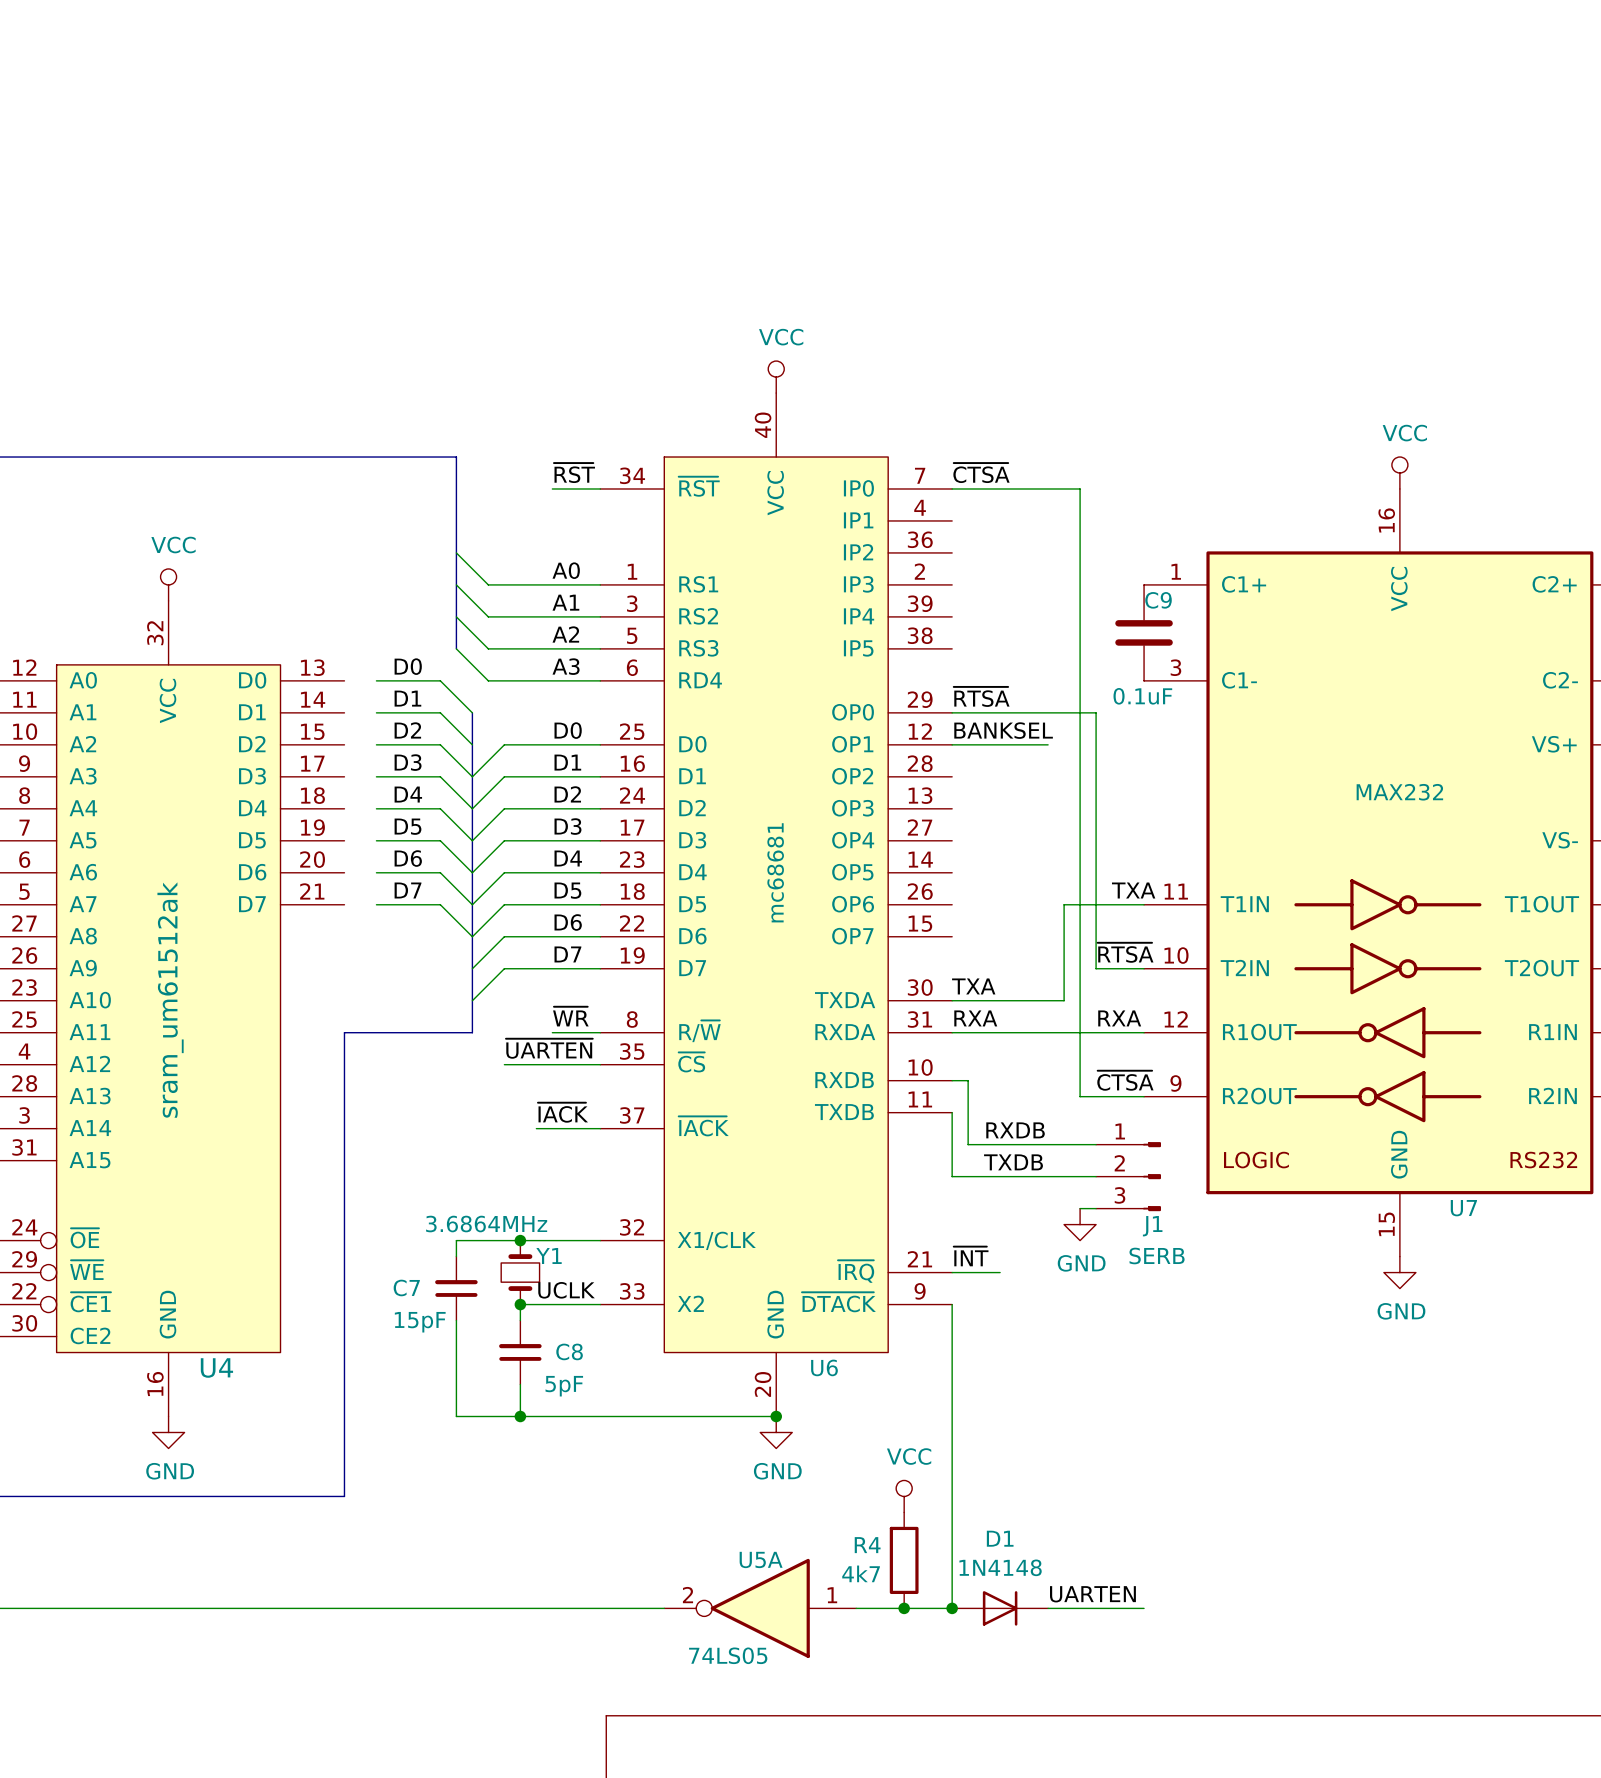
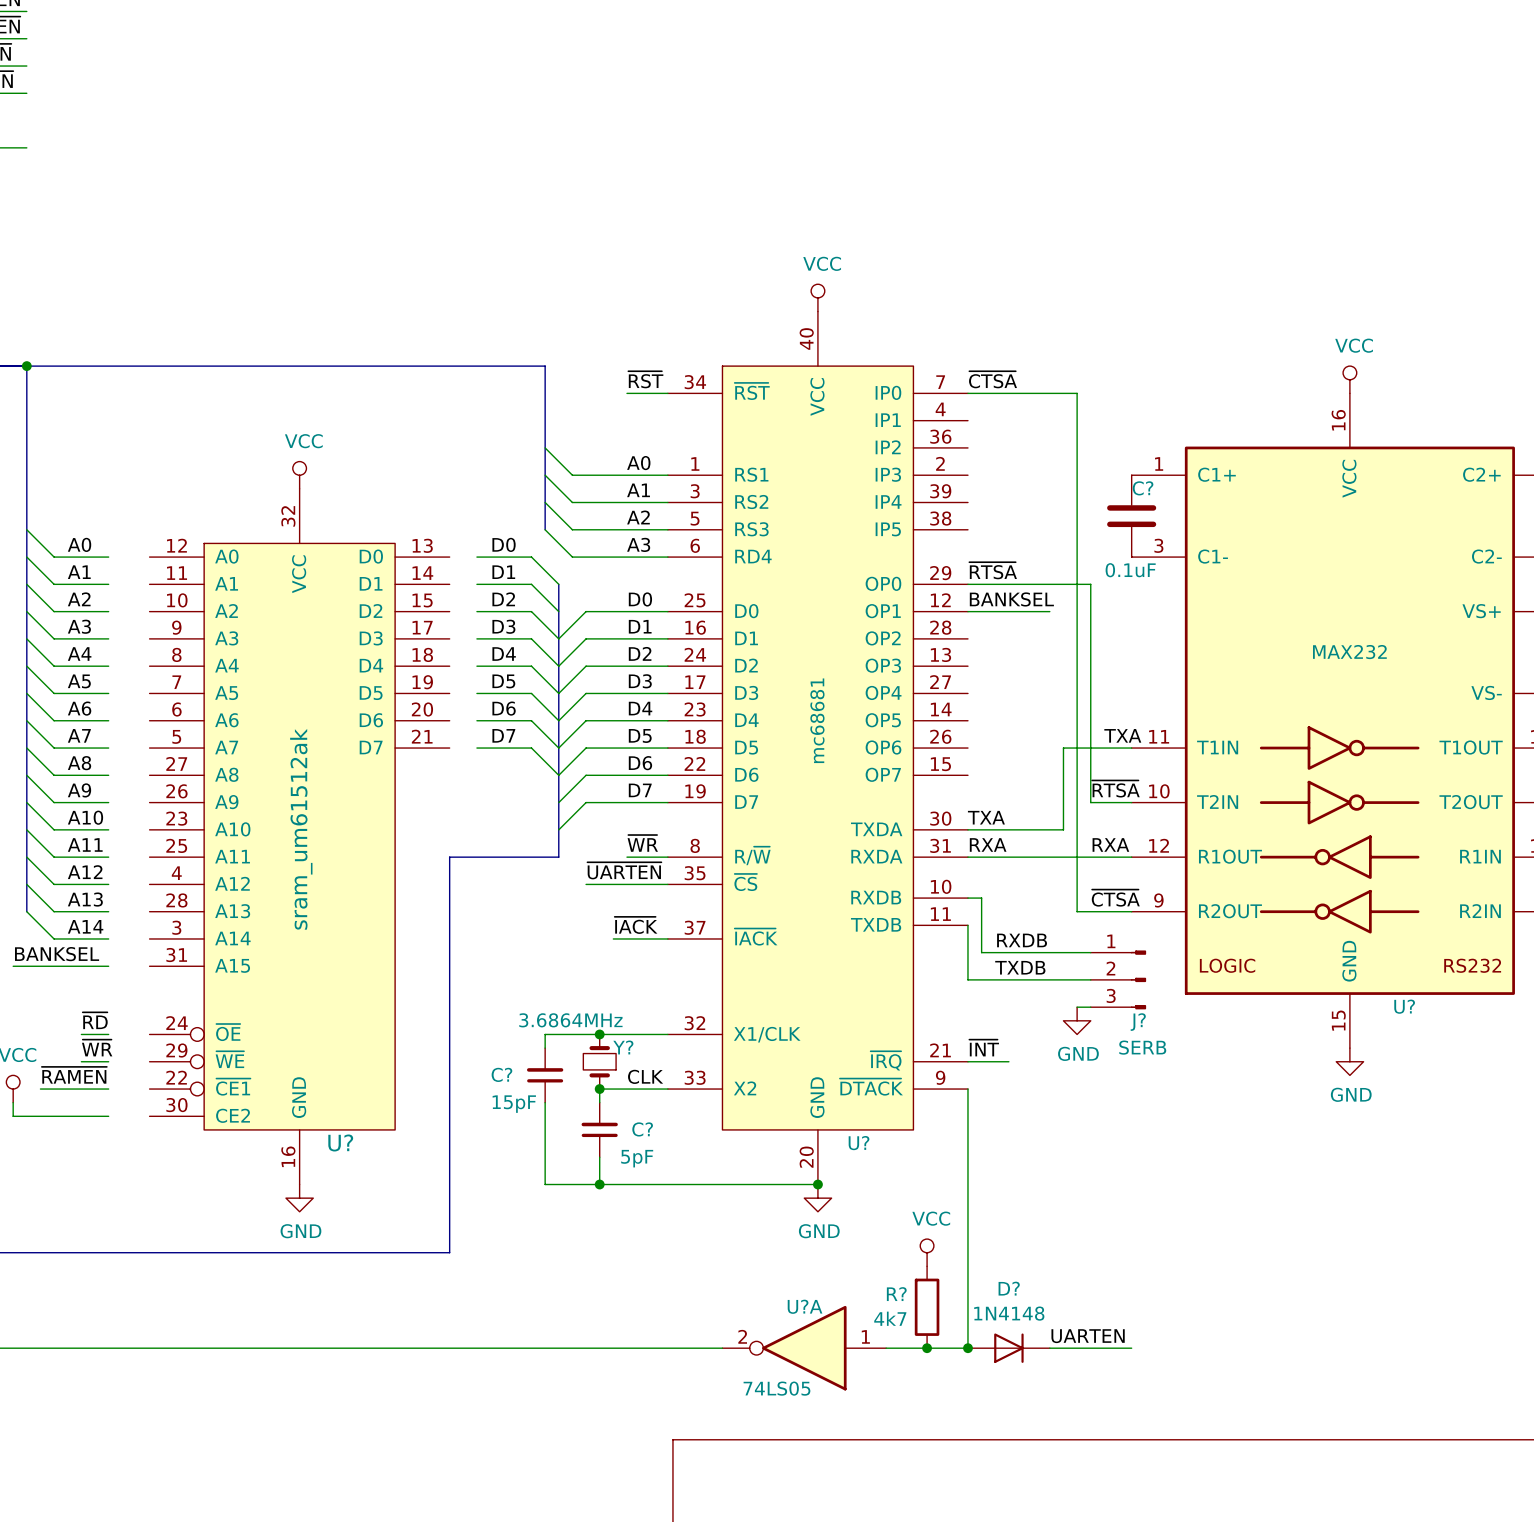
C9 name: C9 (1158, 600) -> C? (1143, 488)
U7 name: U7 (1463, 1208) -> U? (1404, 1006)
J1 name: J1 (1152, 1226) -> J? (1138, 1022)
Y1 name: Y1 (549, 1255) -> Y? (623, 1047)
C7 name: C7 (406, 1287) -> C? (501, 1074)
label: UCLK (566, 1290) -> CLK (645, 1076)
C8 name: C8 (569, 1351) -> C? (642, 1129)
U4 name: U4 (216, 1367) -> U? (340, 1142)
U6 name: U6 (824, 1367) -> U? (859, 1143)
D1 name: D1 (1000, 1538) -> D? (1009, 1288)
R4 name: R4 (867, 1545) -> R? (896, 1294)
U5A name: U5A (761, 1559) -> U?A (805, 1306)

